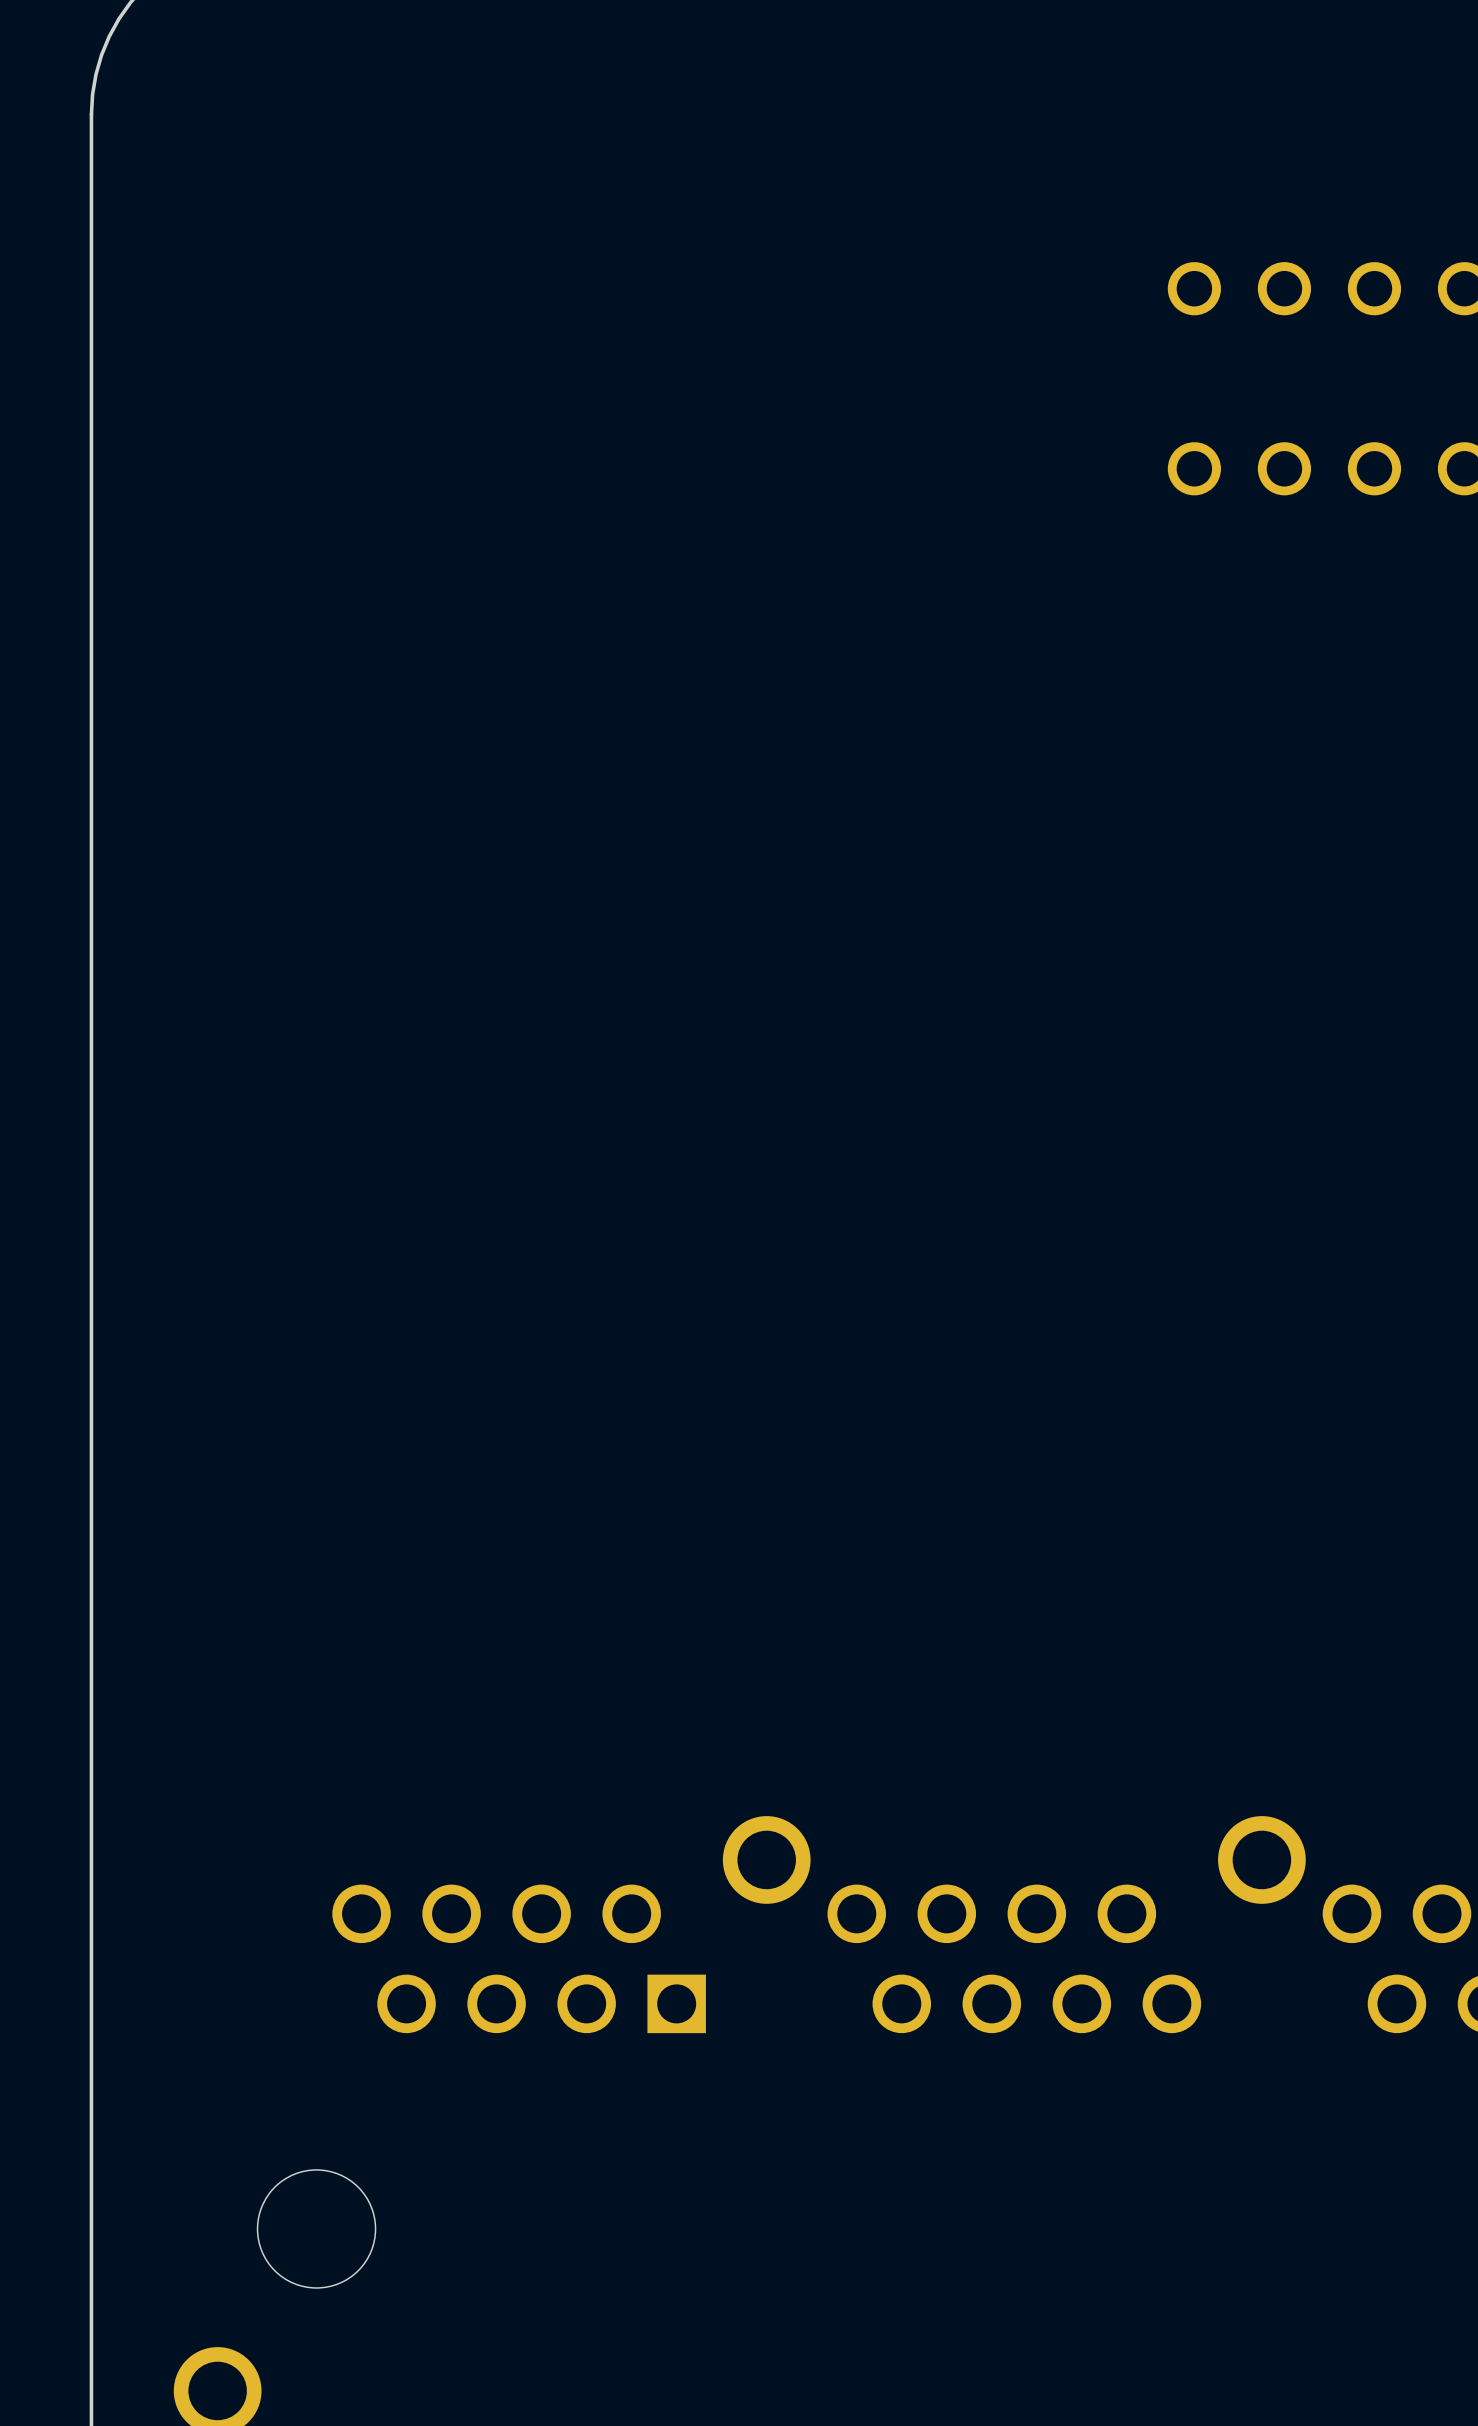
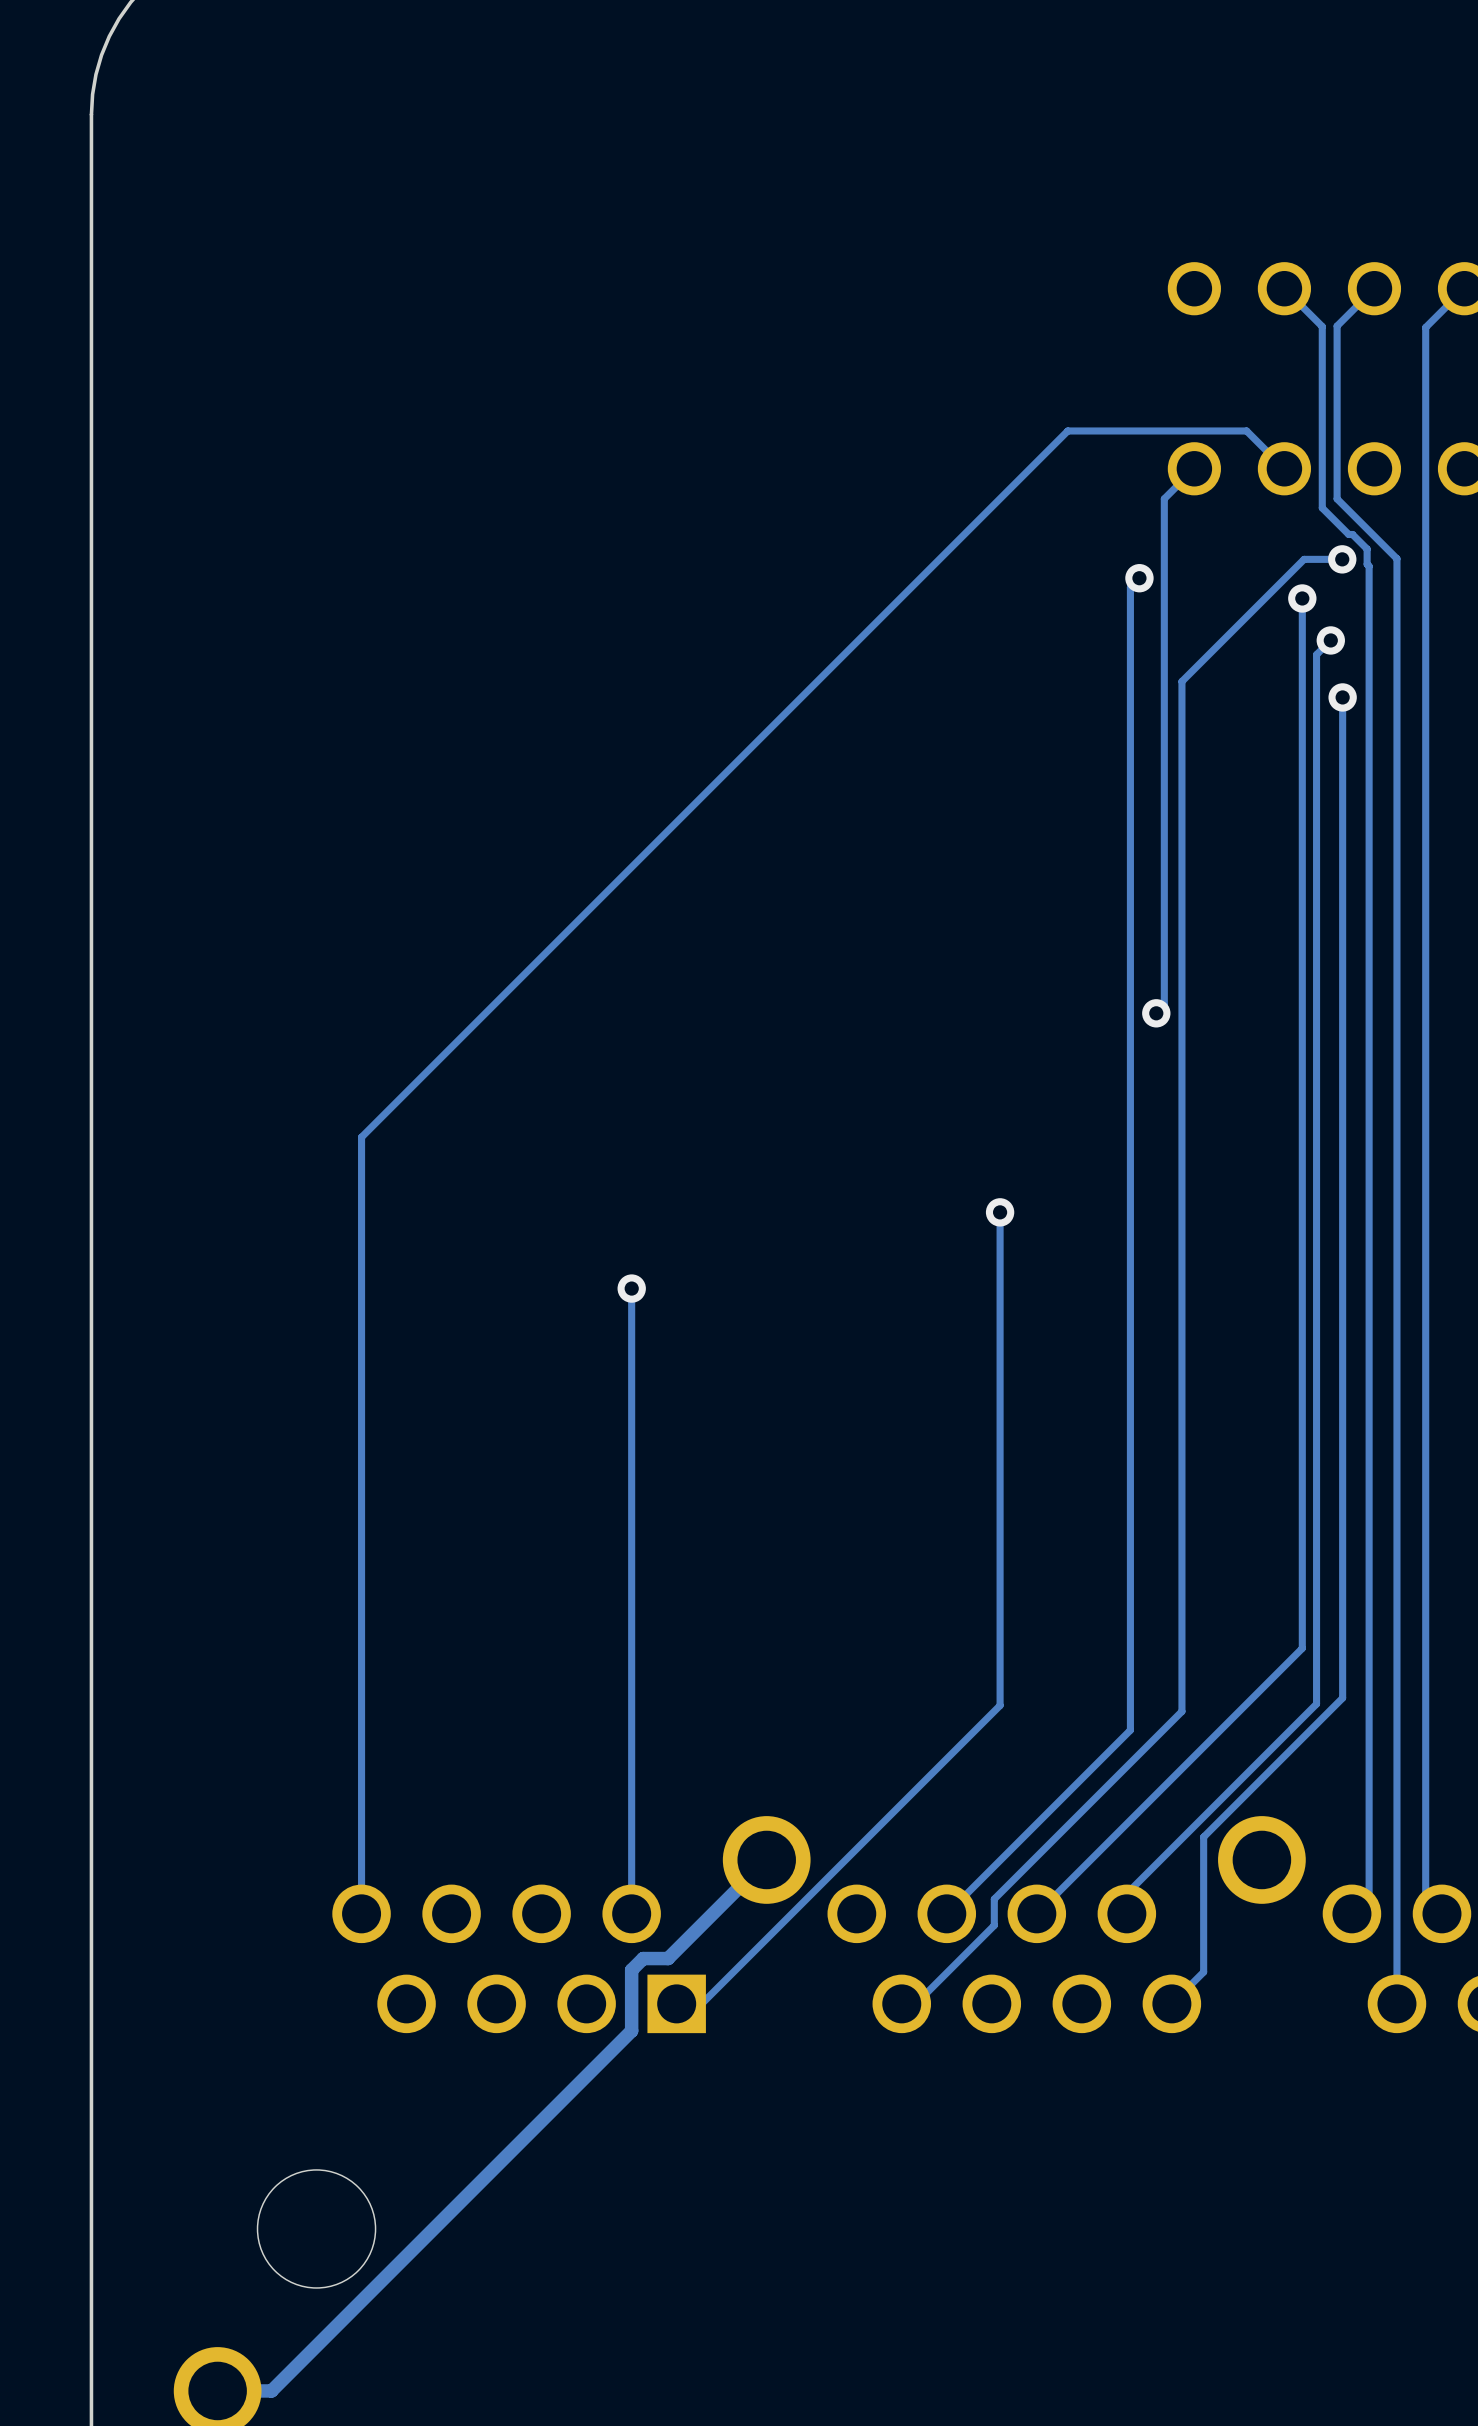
track: none -> (1284, 288) (1322, 326) (1322, 508) (1348, 534) (1352, 534) (1367, 549) (1367, 564) (1369, 566) (1369, 1896)
track: none -> (1374, 288) (1337, 326) (1337, 498) (1396, 558) (1396, 2003)
track: none -> (1464, 288) (1425, 327) (1425, 1897)
track: none -> (1194, 468) (1164, 498) (1164, 1005) (1156, 1013)
track: none -> (1284, 468) (1246, 430) (1067, 430) (361, 1137) (361, 1913)
track: none -> (1342, 559) (1304, 559) (1181, 681) (1181, 1711) (994, 1899) (994, 1925) (915, 2003)
via: none -> (1342, 559)
track: none -> (1139, 578) (1130, 587) (1130, 1730) (946, 1913)
via: none -> (1139, 578)
track: none -> (1302, 598) (1302, 1648) (1036, 1913)
via: none -> (1302, 598)
track: none -> (1330, 640) (1316, 654) (1316, 1704) (1126, 1893)
via: none -> (1330, 640)
track: none -> (1342, 697) (1342, 1698) (1203, 1837) (1203, 1972) (1171, 2003)
via: none -> (1342, 697)
via: none -> (1156, 1013)
track: none -> (1000, 1212) (1000, 1705) (701, 2003)
via: none -> (1000, 1212)
track: none -> (631, 1288) (631, 1913)
via: none -> (631, 1288)
track: none -> (766, 1859) (668, 1958) (643, 1958) (631, 1970) (631, 2030) (271, 2390) (217, 2390)

